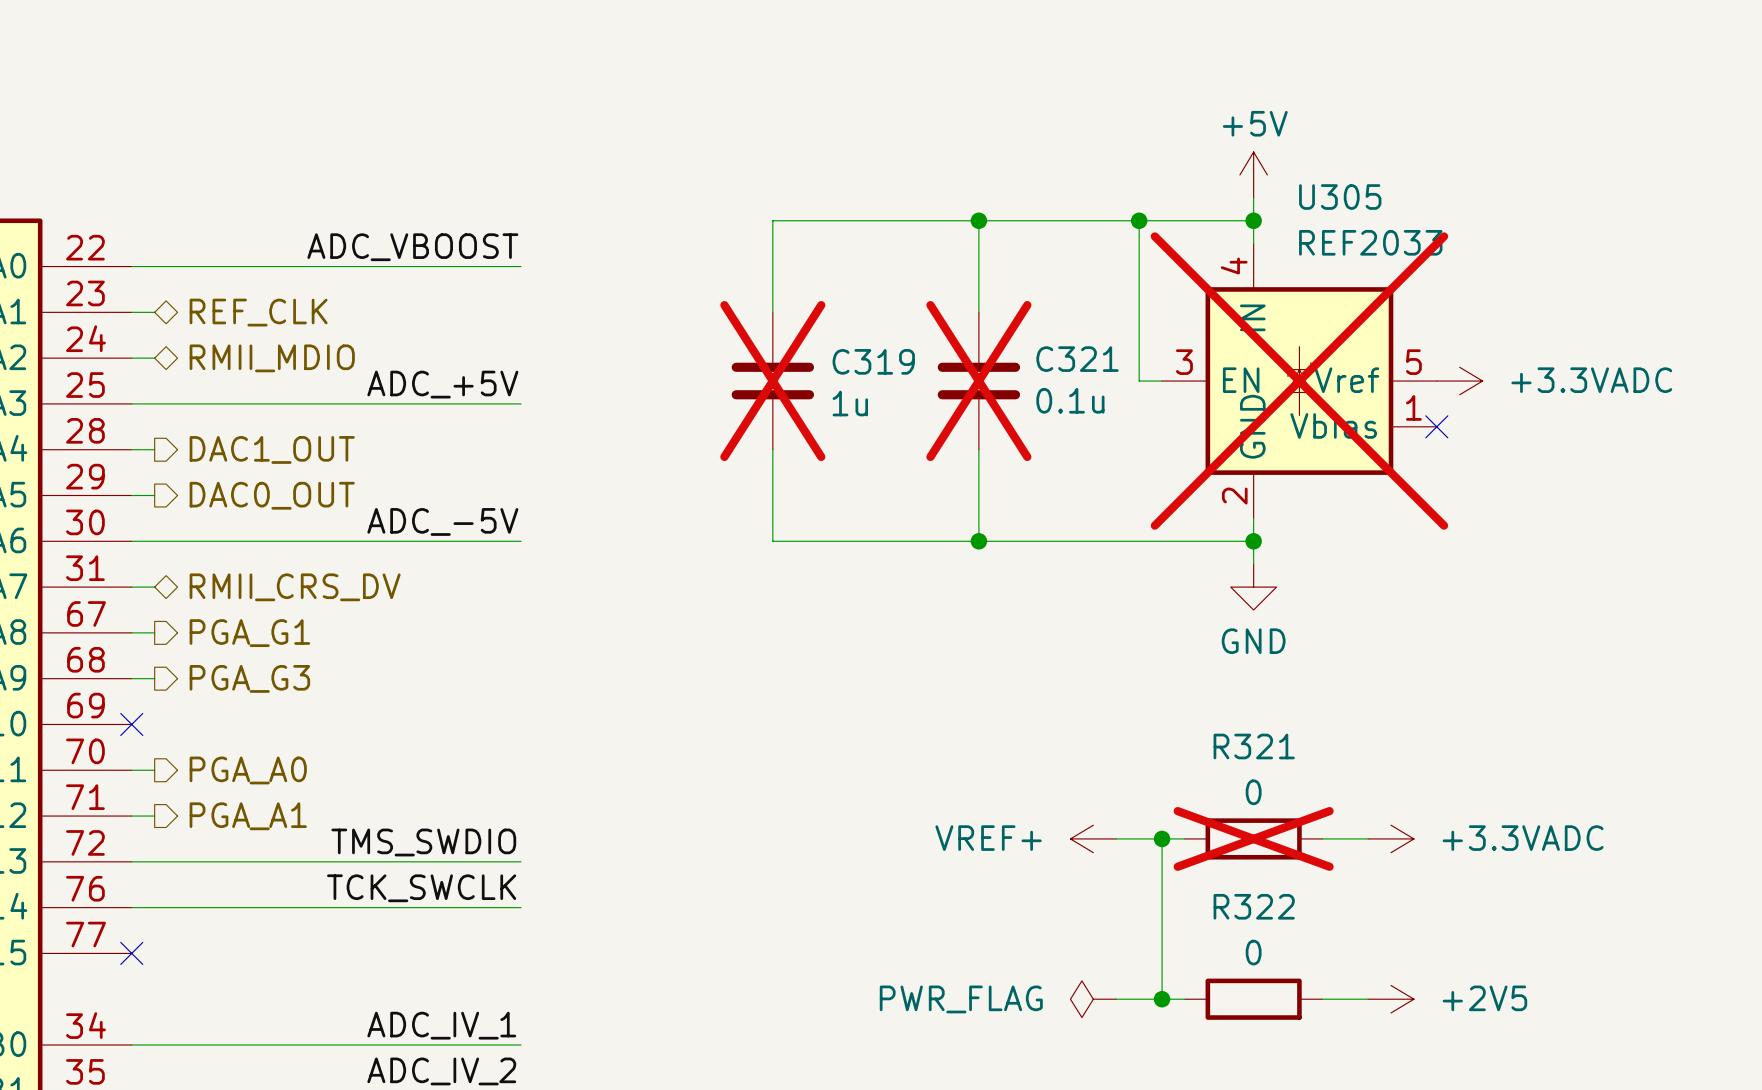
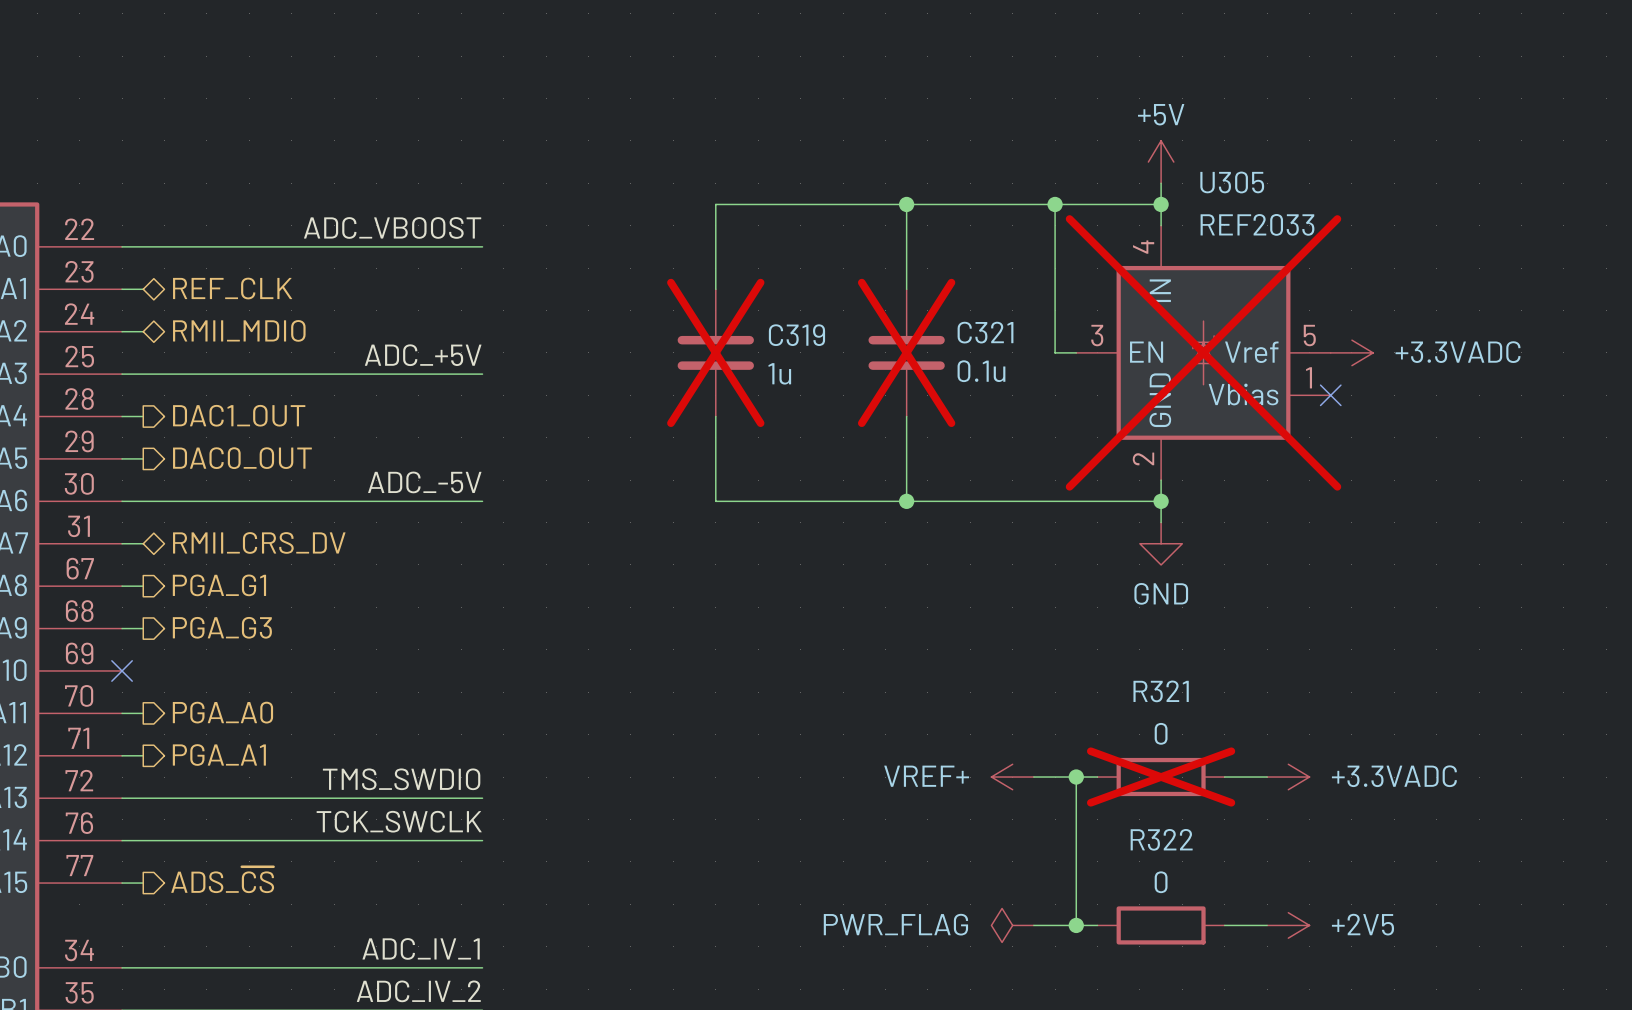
hierarchical label: none -> ADS_~{CS} (222, 879)
wire: none -> (122, 883) (143, 883)
no-connect mark: (131, 953) -> none

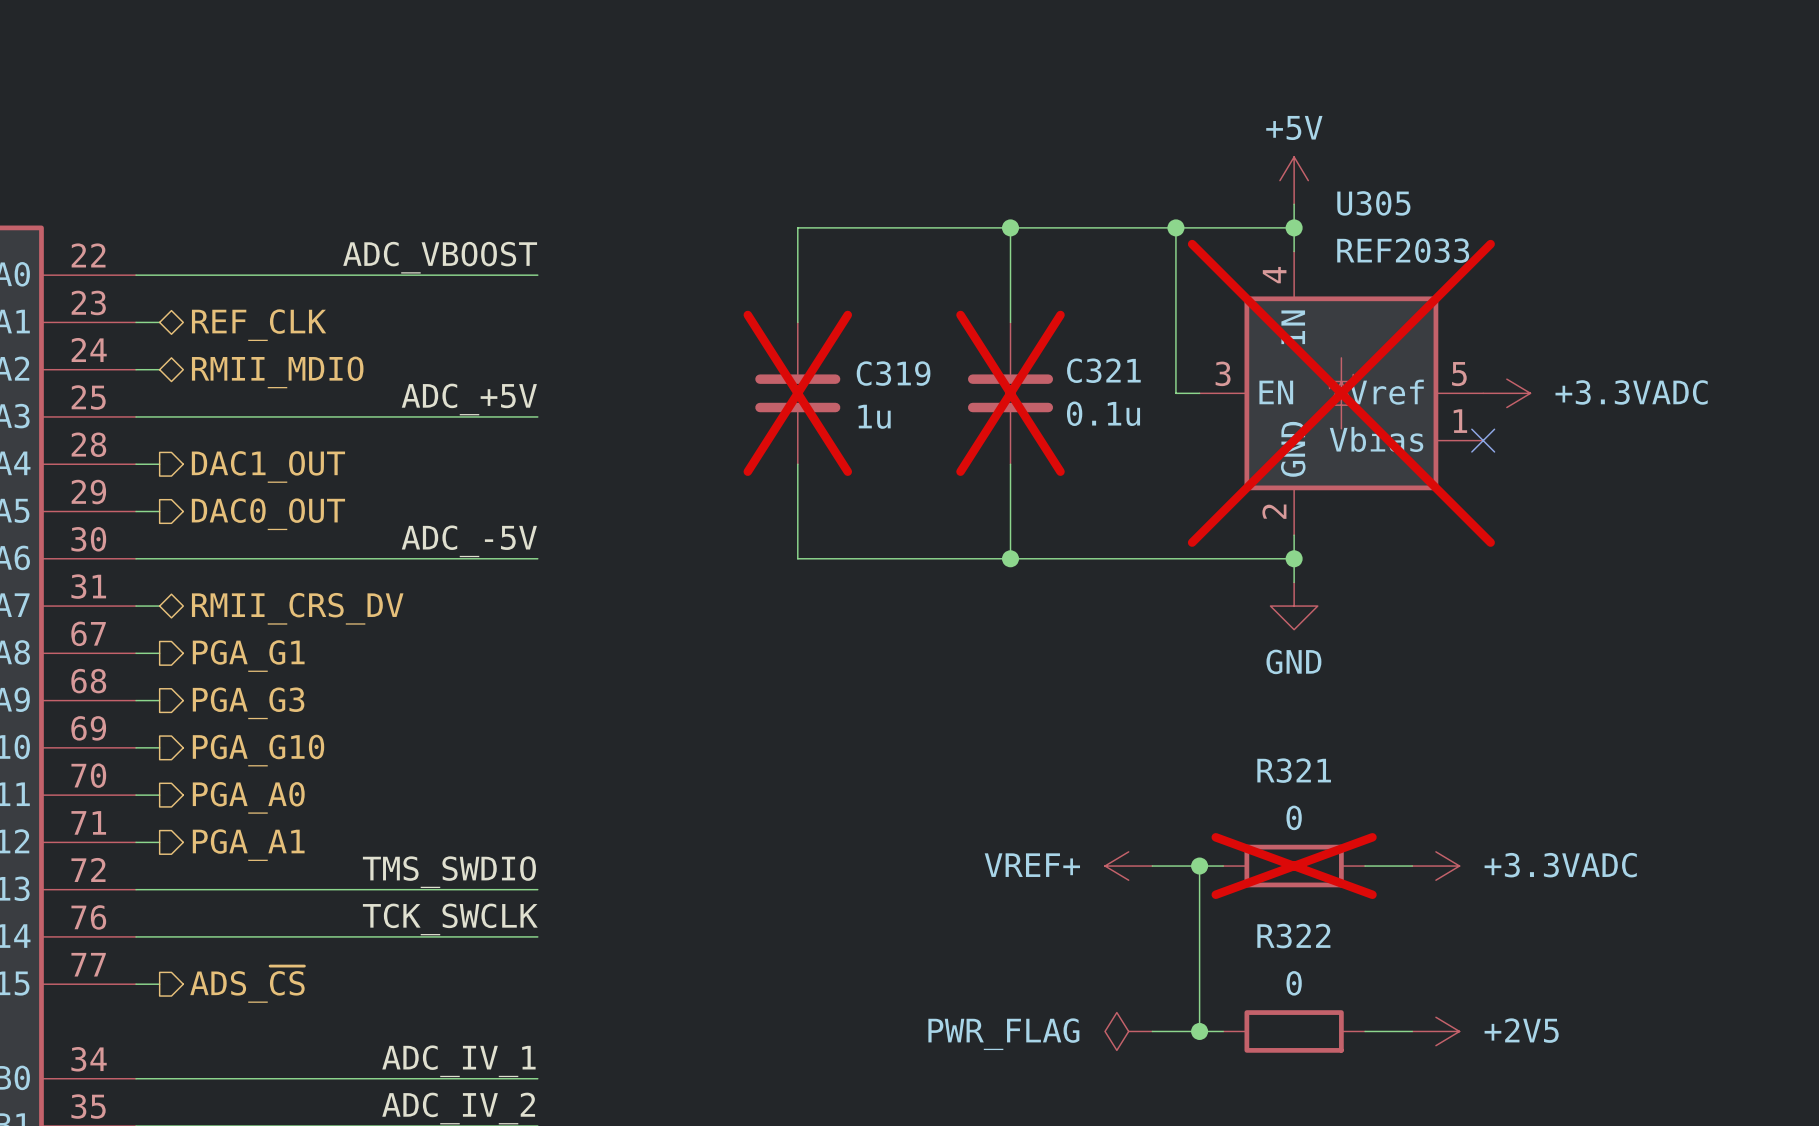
wire: none -> (136, 747) (159, 747)
no-connect mark: (122, 670) -> none
hierarchical label: none -> PGA_G10 (258, 750)

